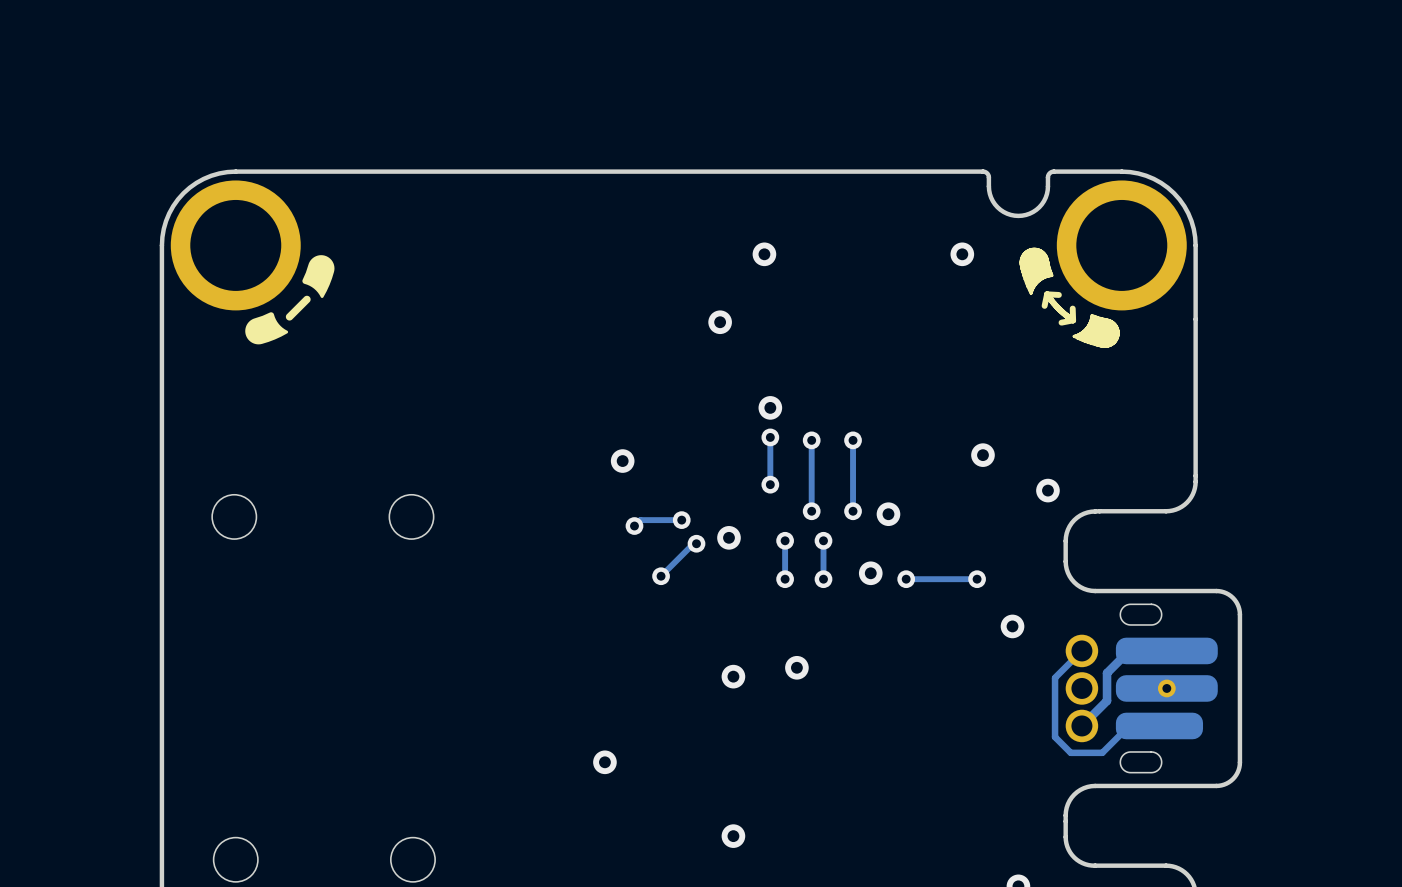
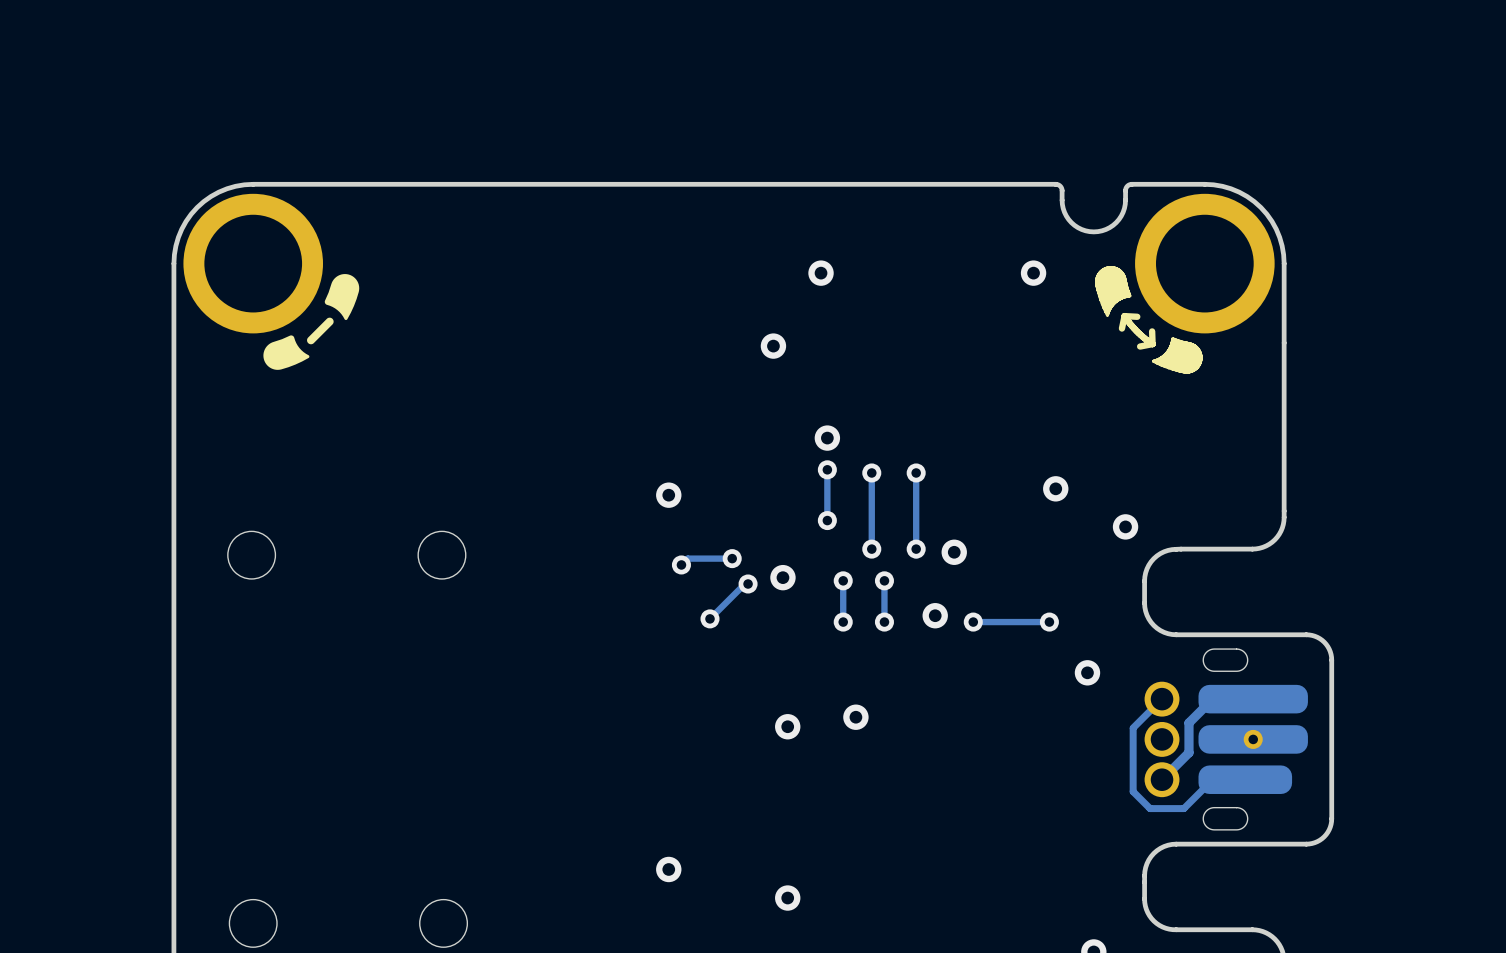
via position: (604, 762) -> (668, 869)

